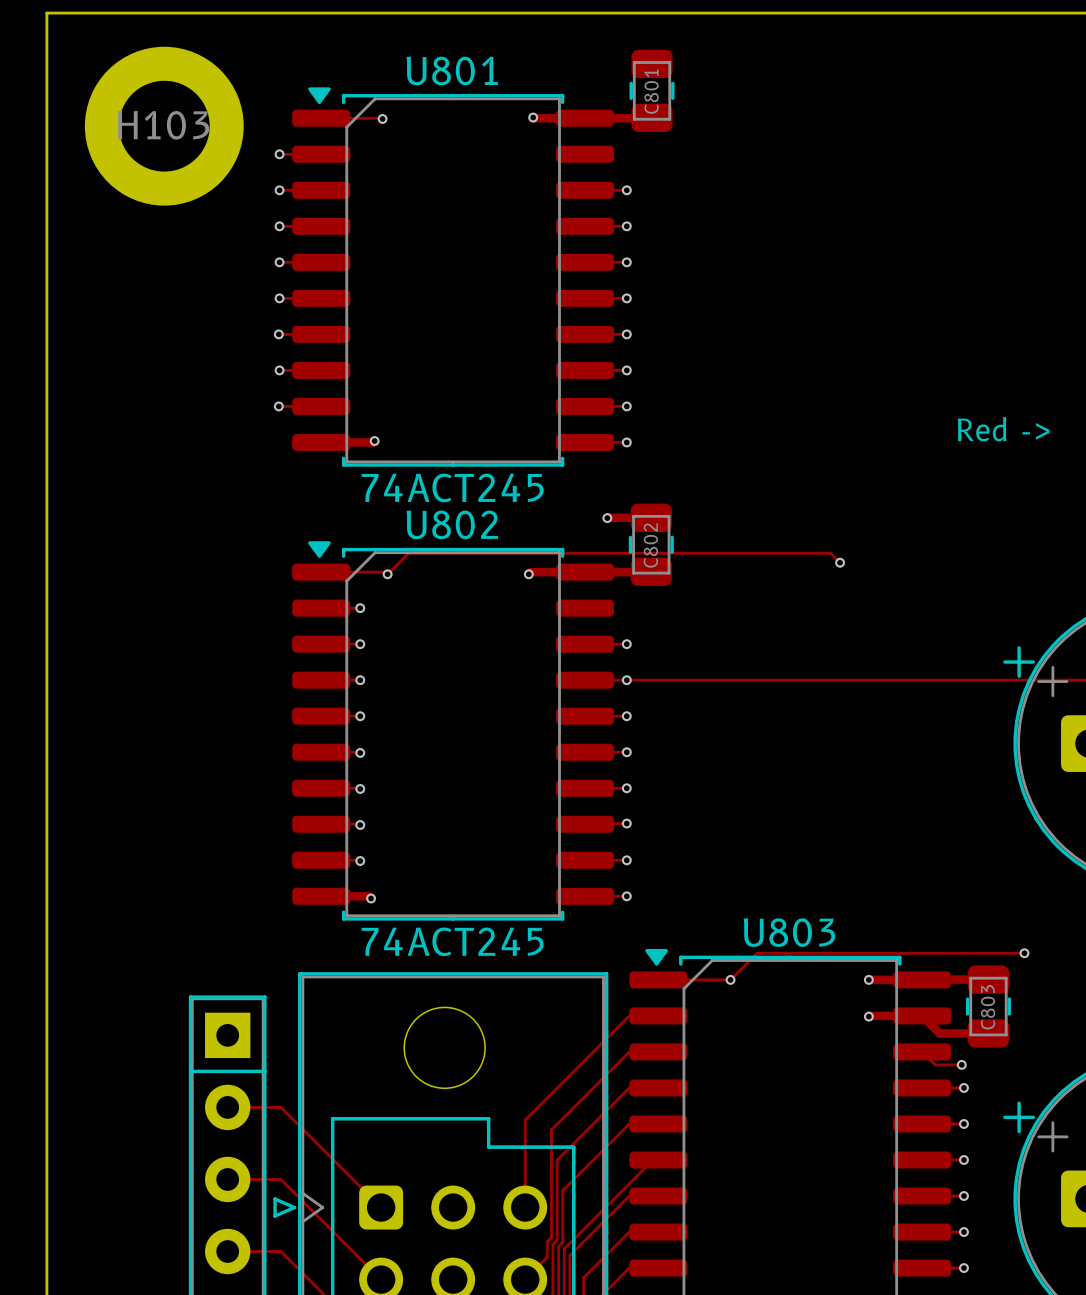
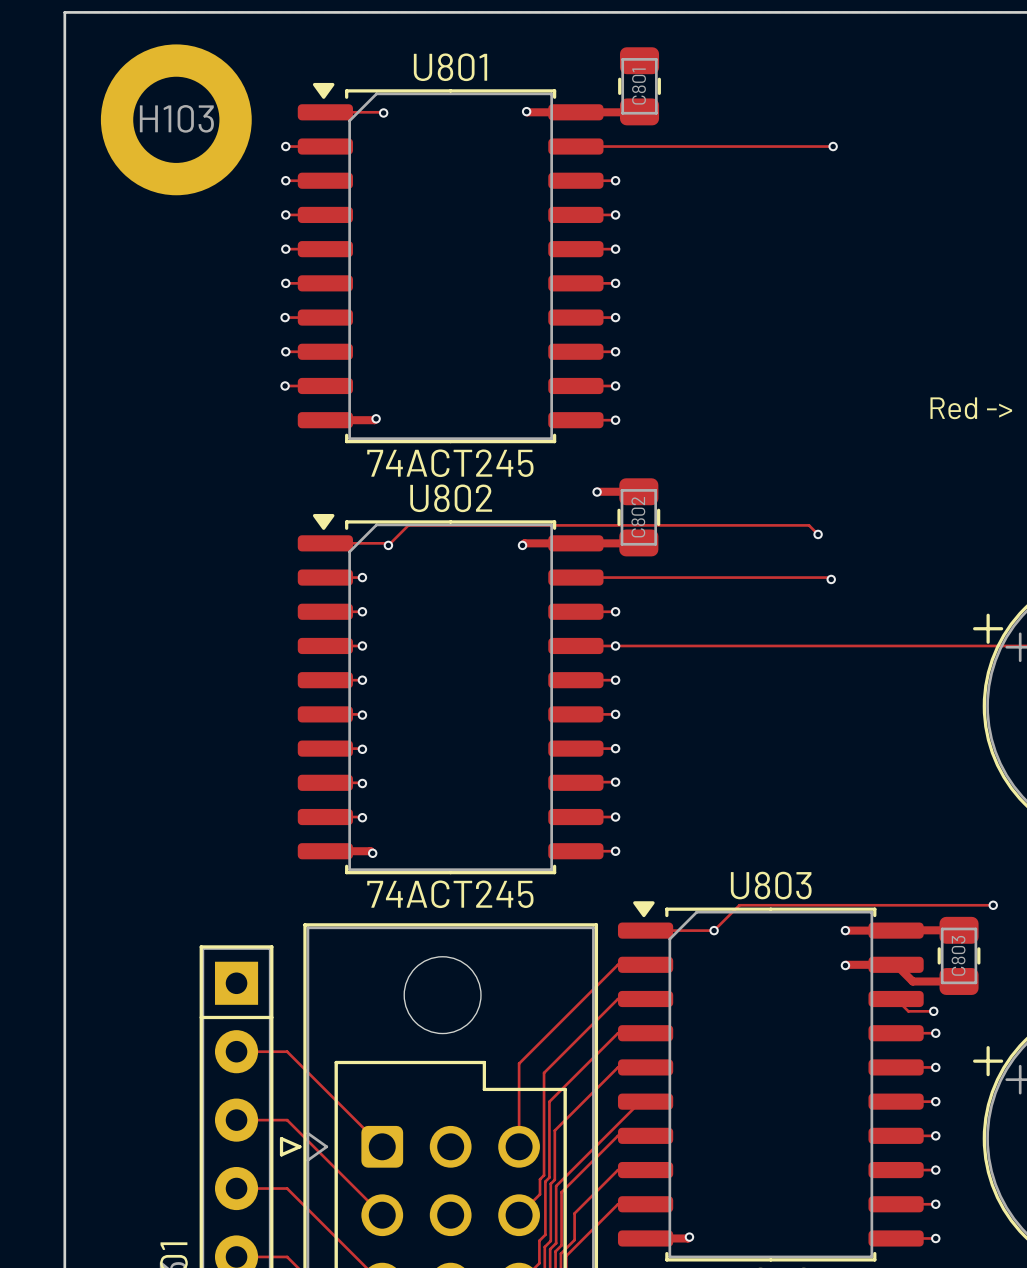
track: none -> (575, 146) (833, 146)
via: none -> (833, 146)
track: none -> (575, 577) (829, 577) (831, 579)
via: none -> (831, 579)

